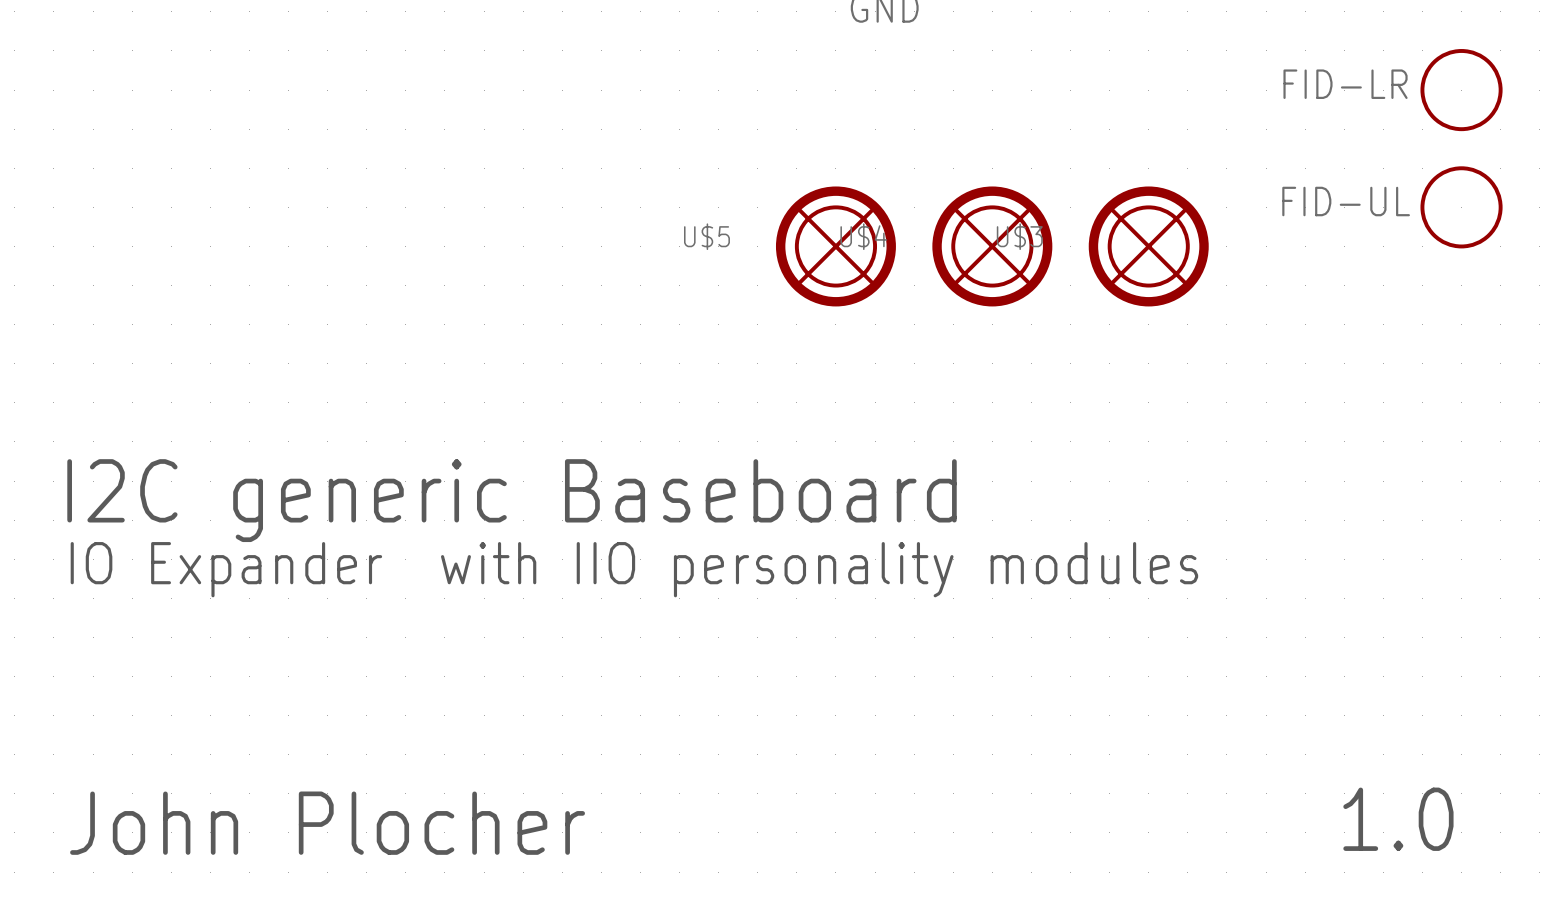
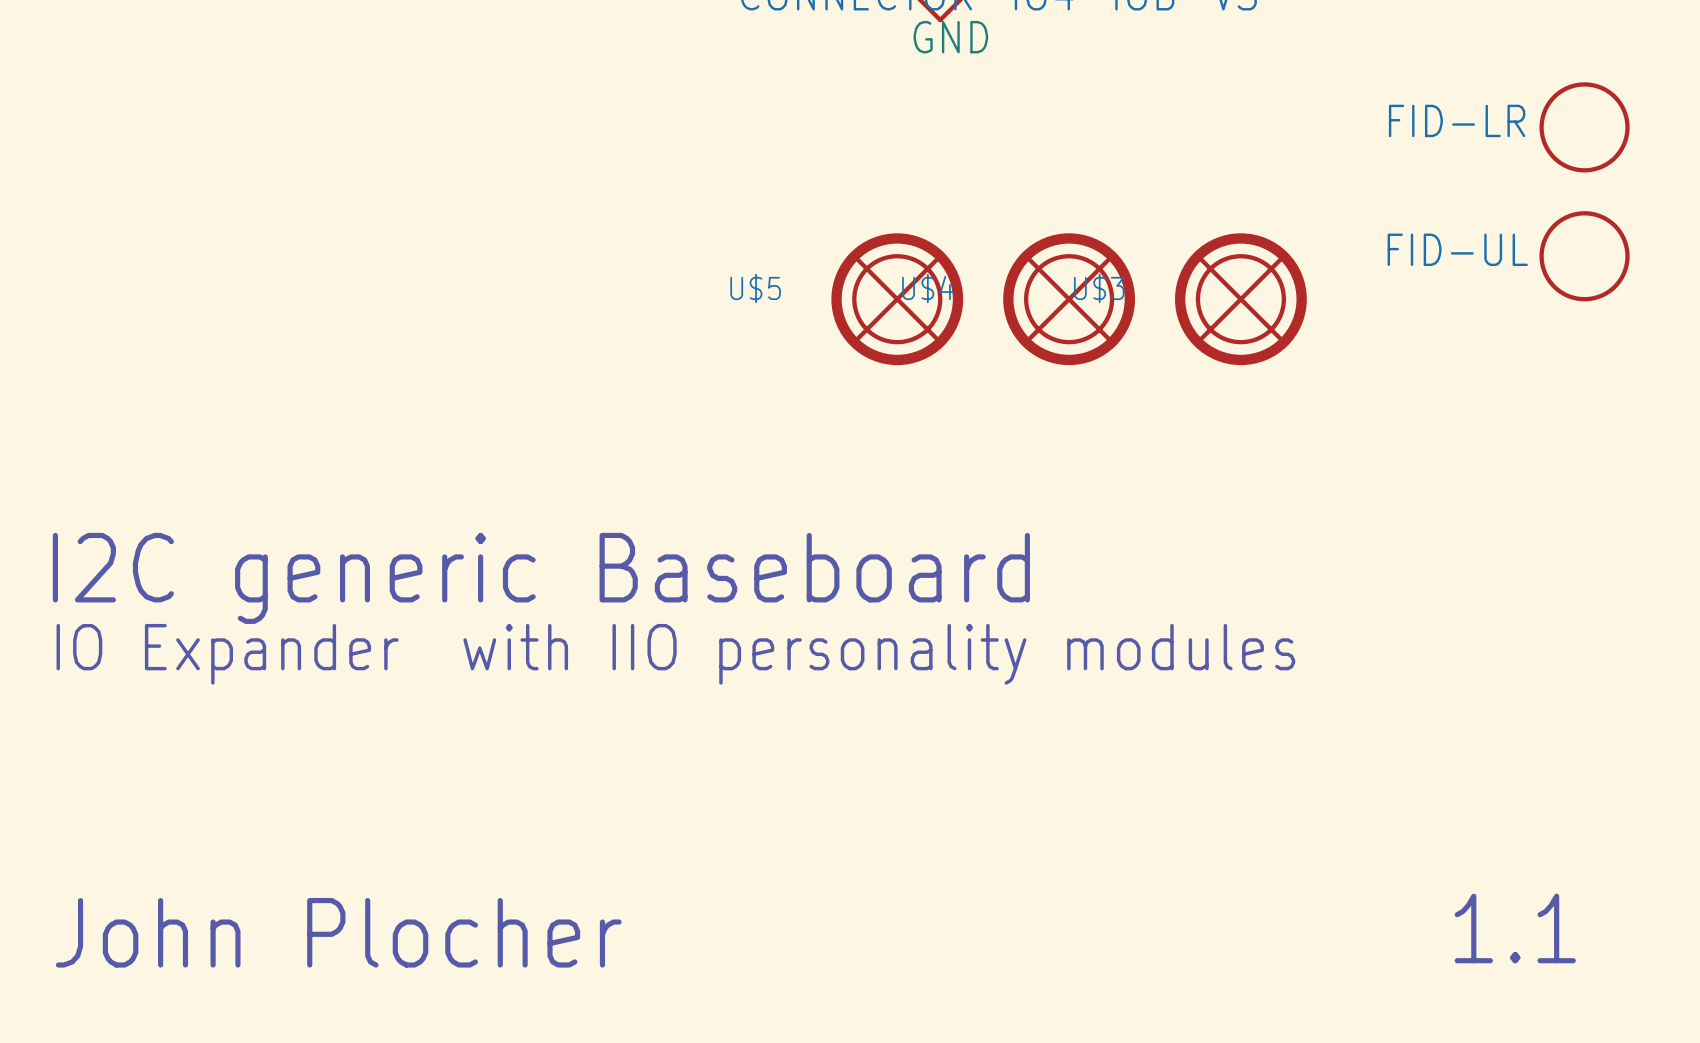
text: 1.0 (1398, 819) -> 1.1 (1515, 928)

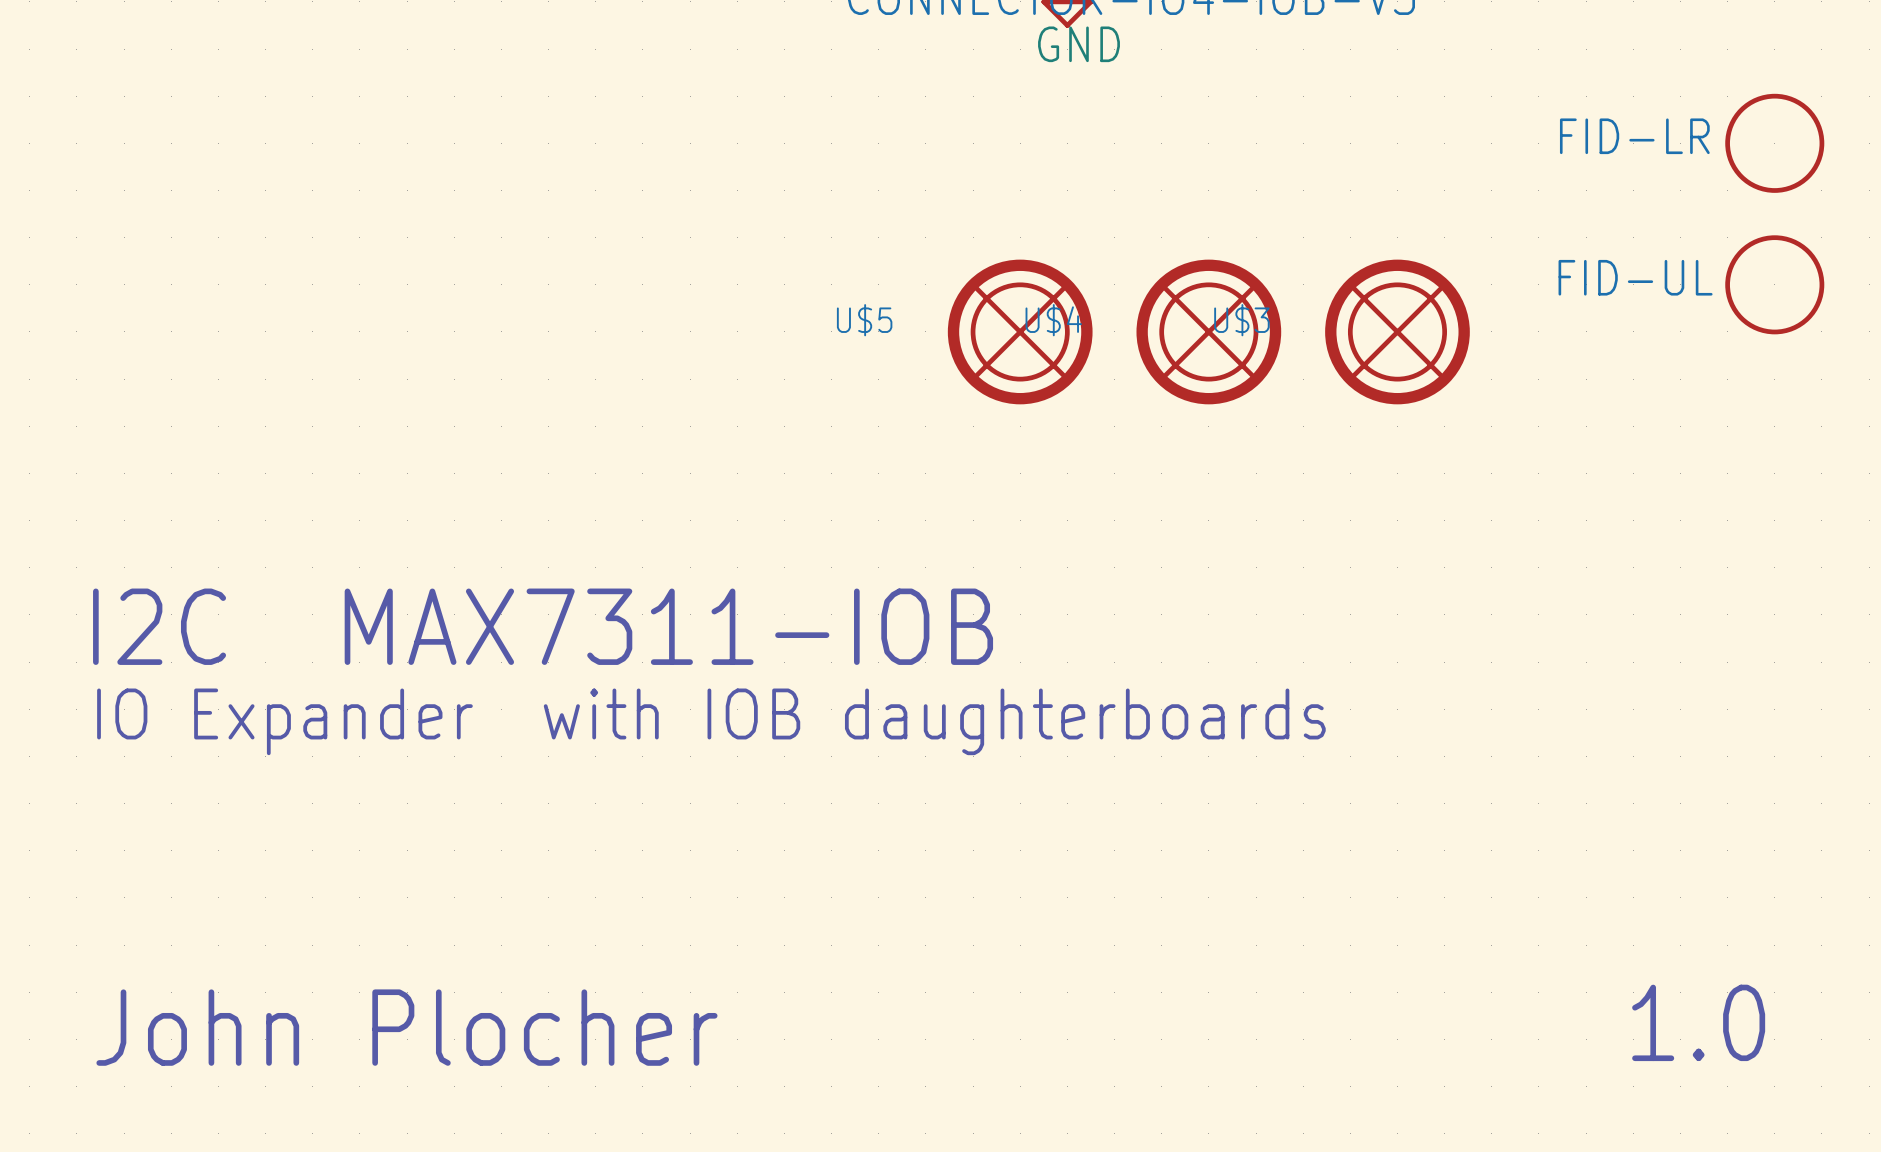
text: I2C generic Baseboard (541, 578) -> I2C MAX7311-IOB (543, 626)
text: IO Expander with IIO personality modules (675, 654) -> IO Expander with IOB daughterboards (711, 721)
text: 1.1 (1515, 928) -> 1.0 (1698, 1022)

